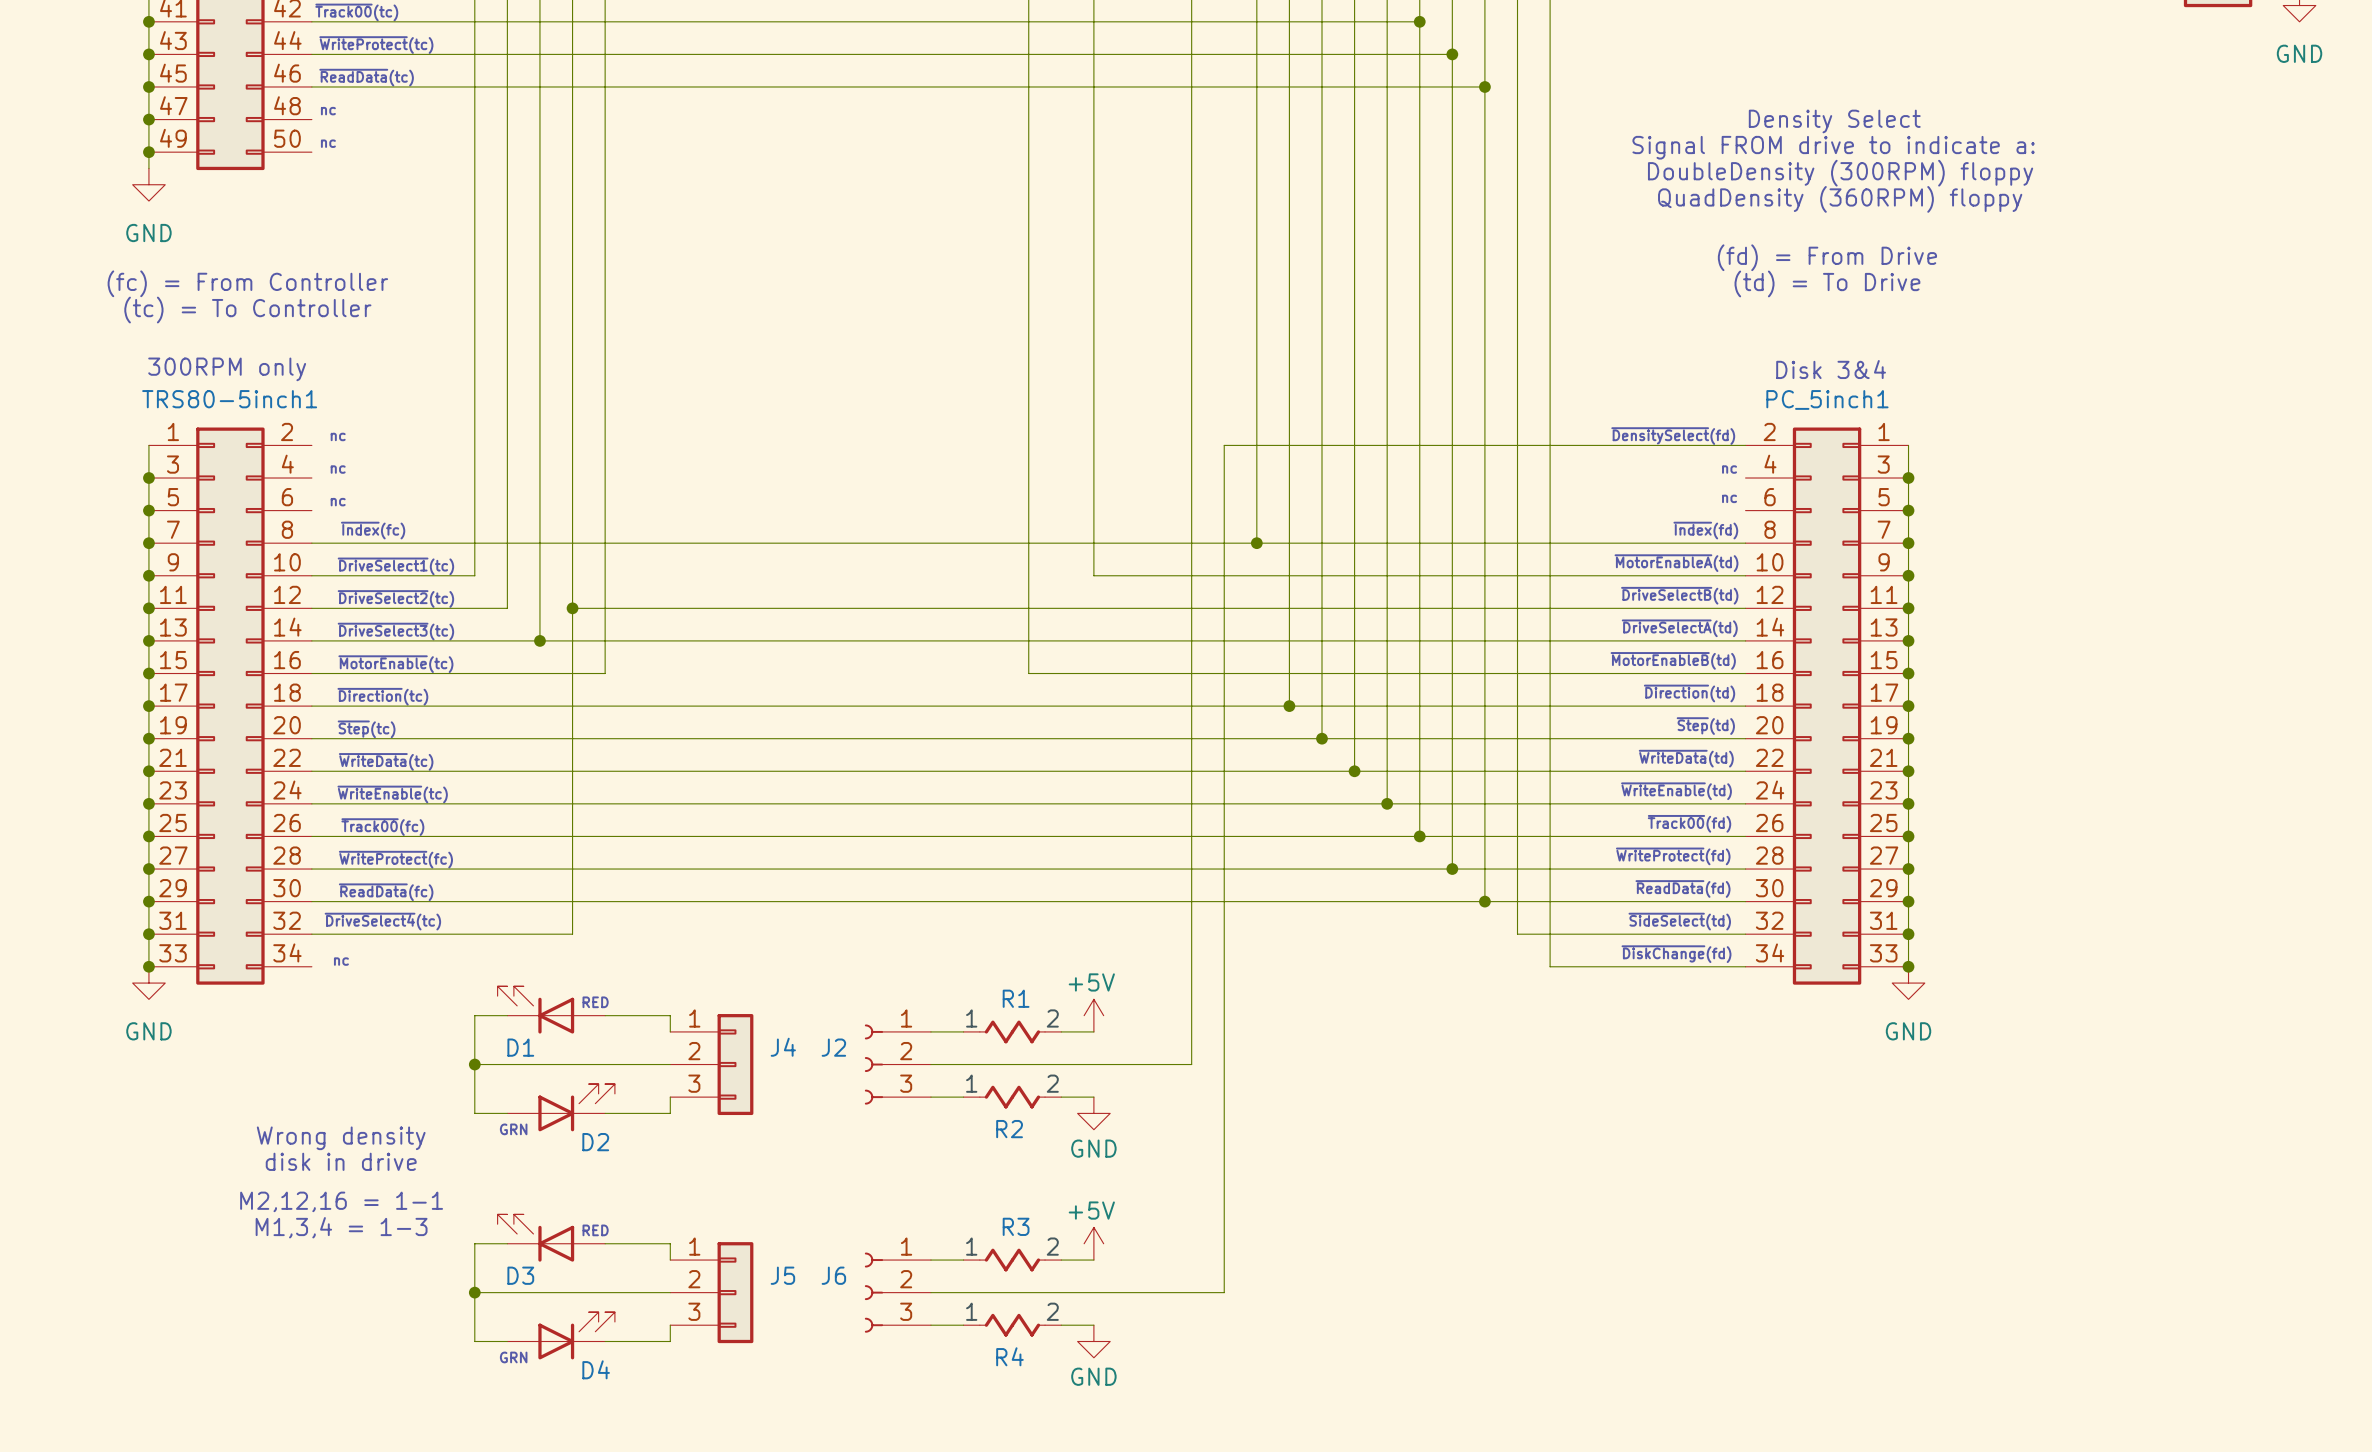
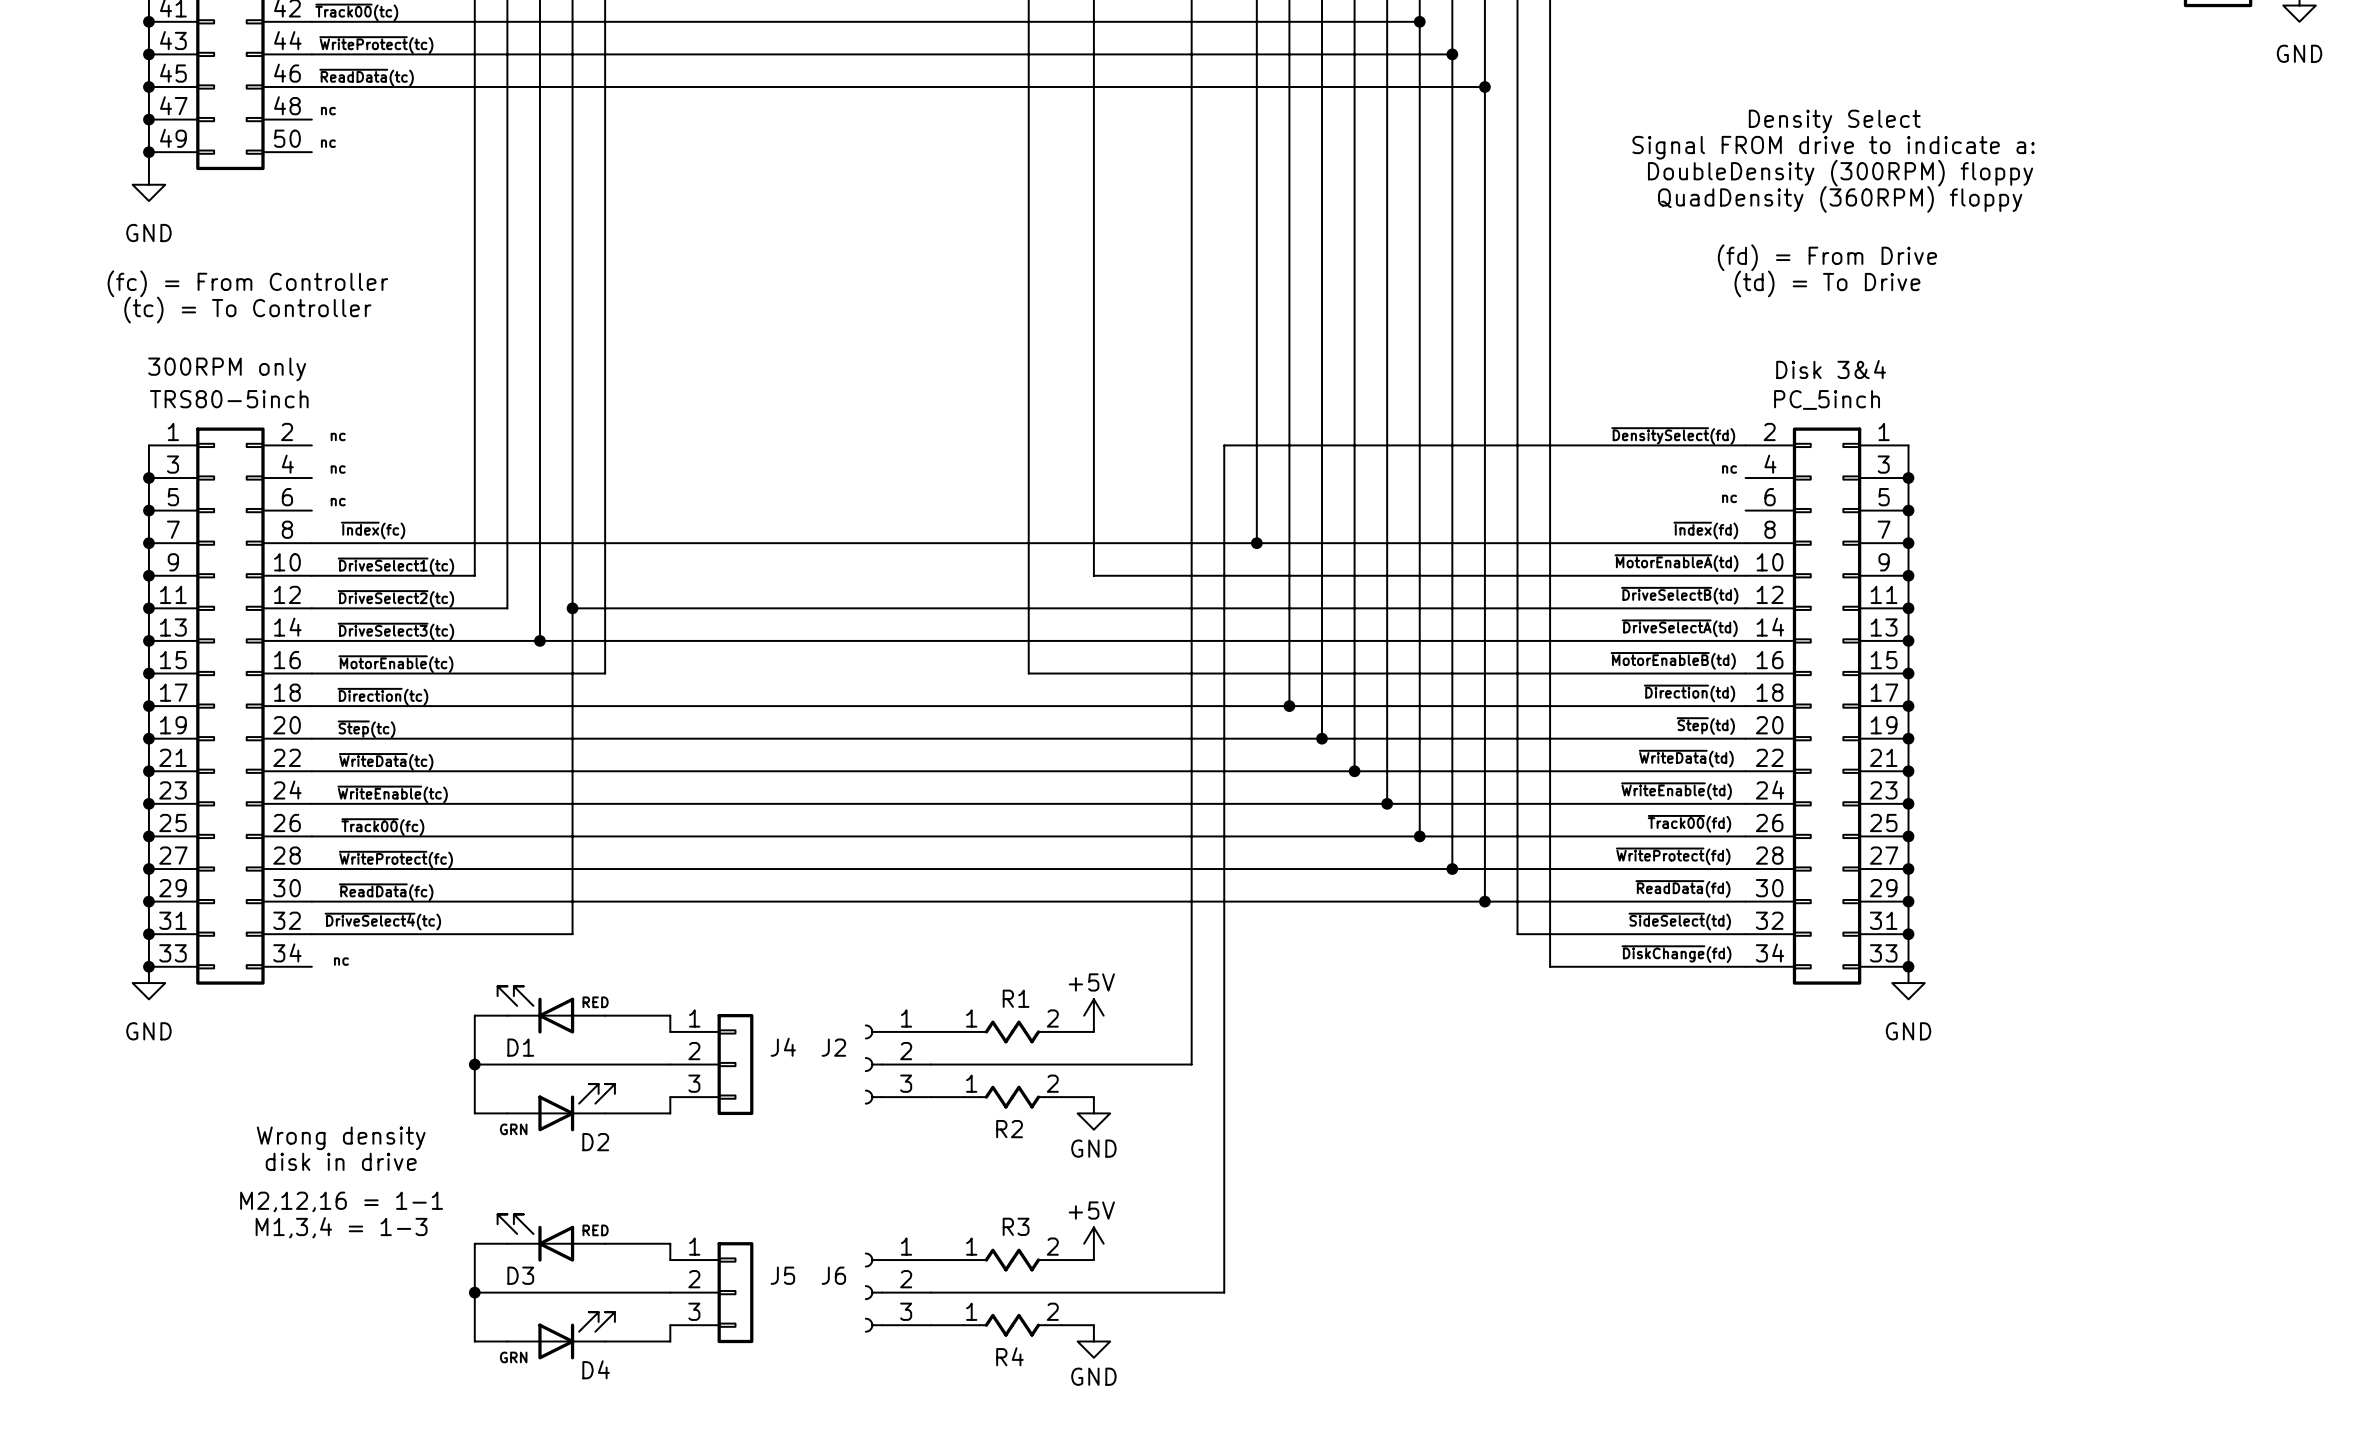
TRS80-5inch1 name: TRS80-5inch1 (229, 399) -> TRS80-5inch (229, 399)
PC_5inch1 name: PC_5inch1 (1827, 399) -> PC_5inch (1827, 399)

